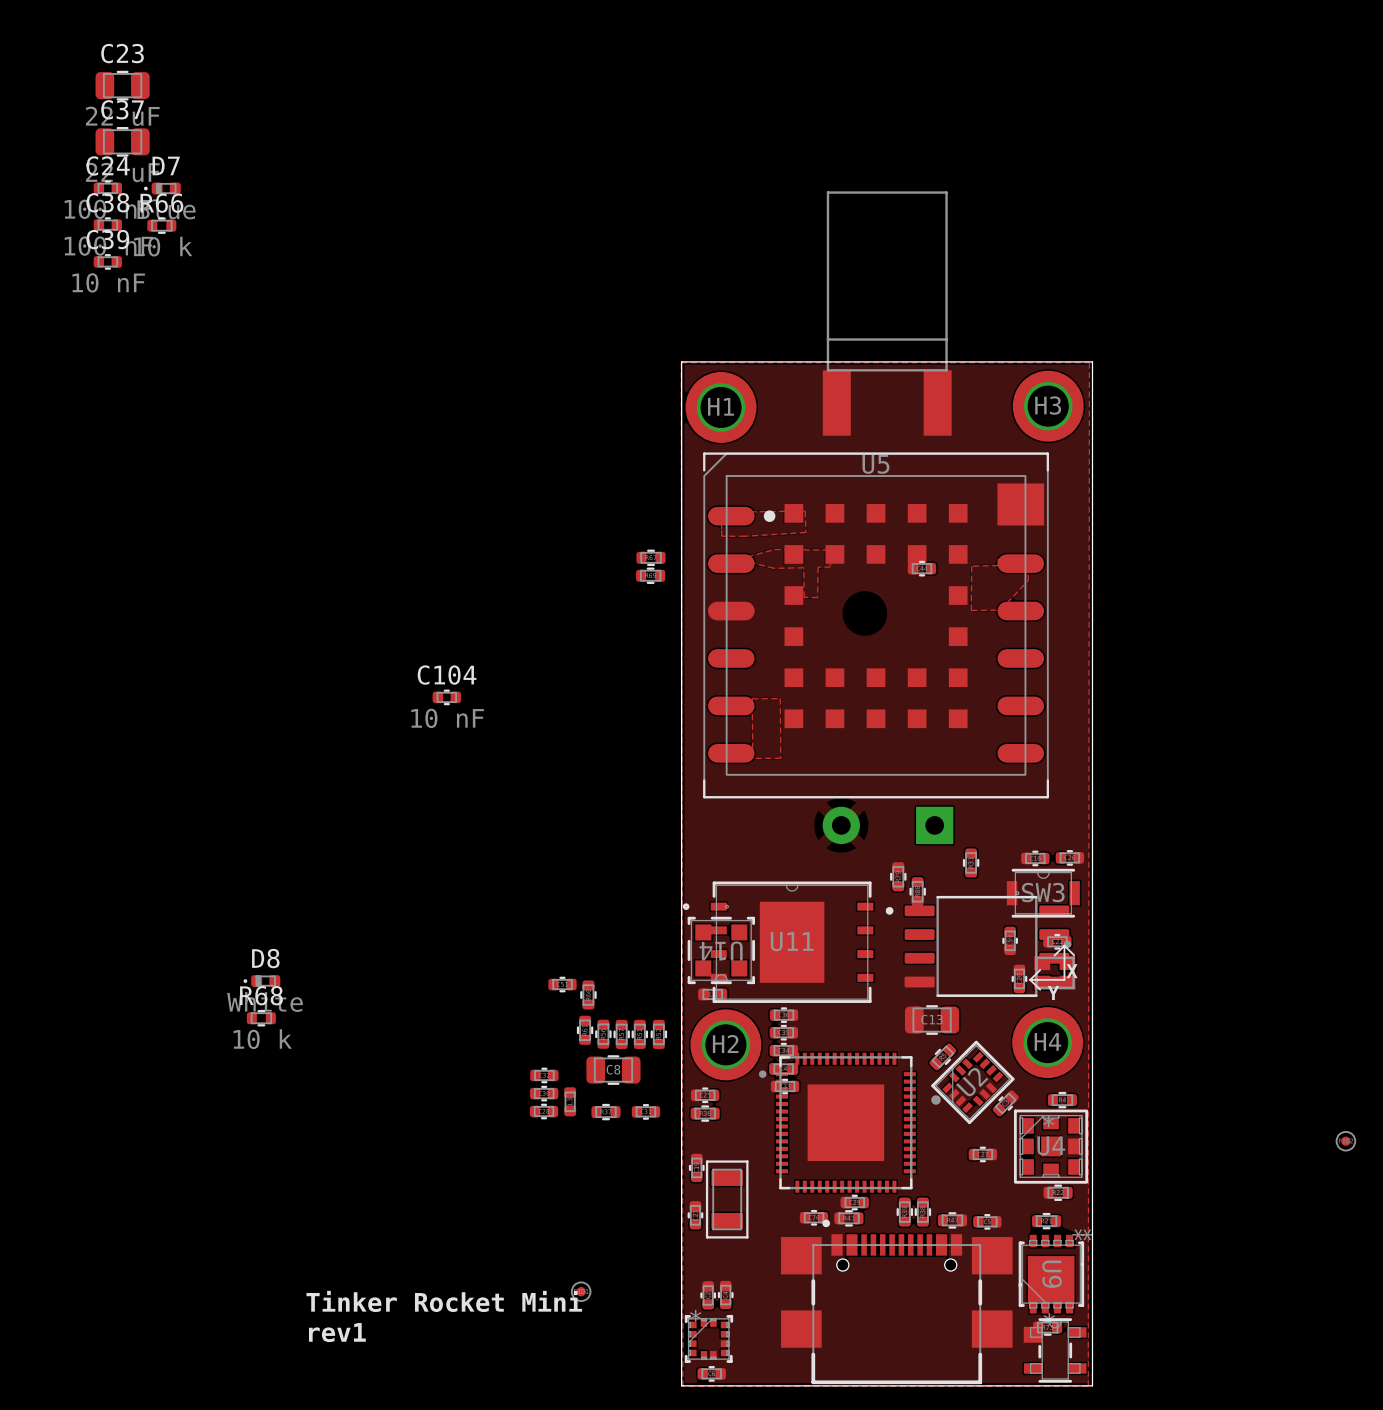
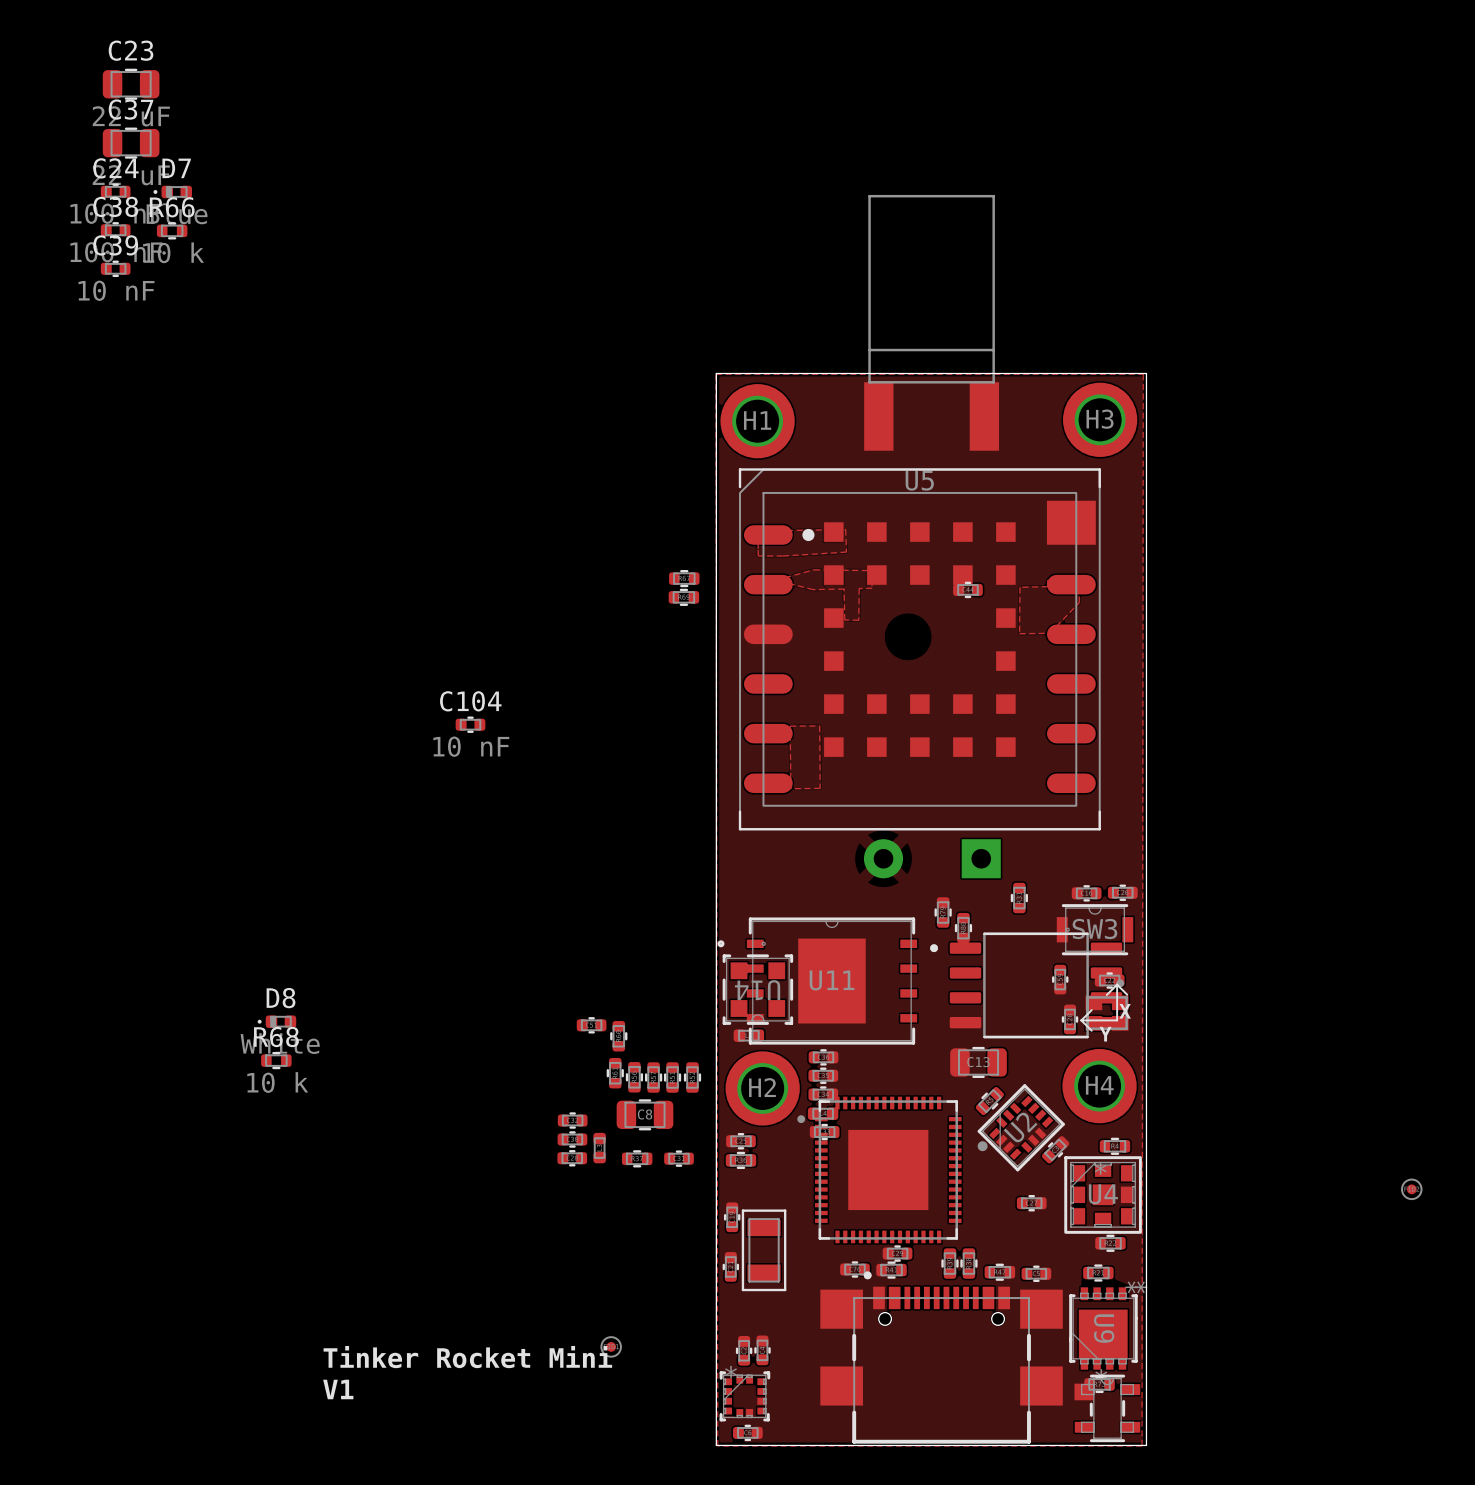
text: rev1 (337, 1332) -> V1 (338, 1389)

